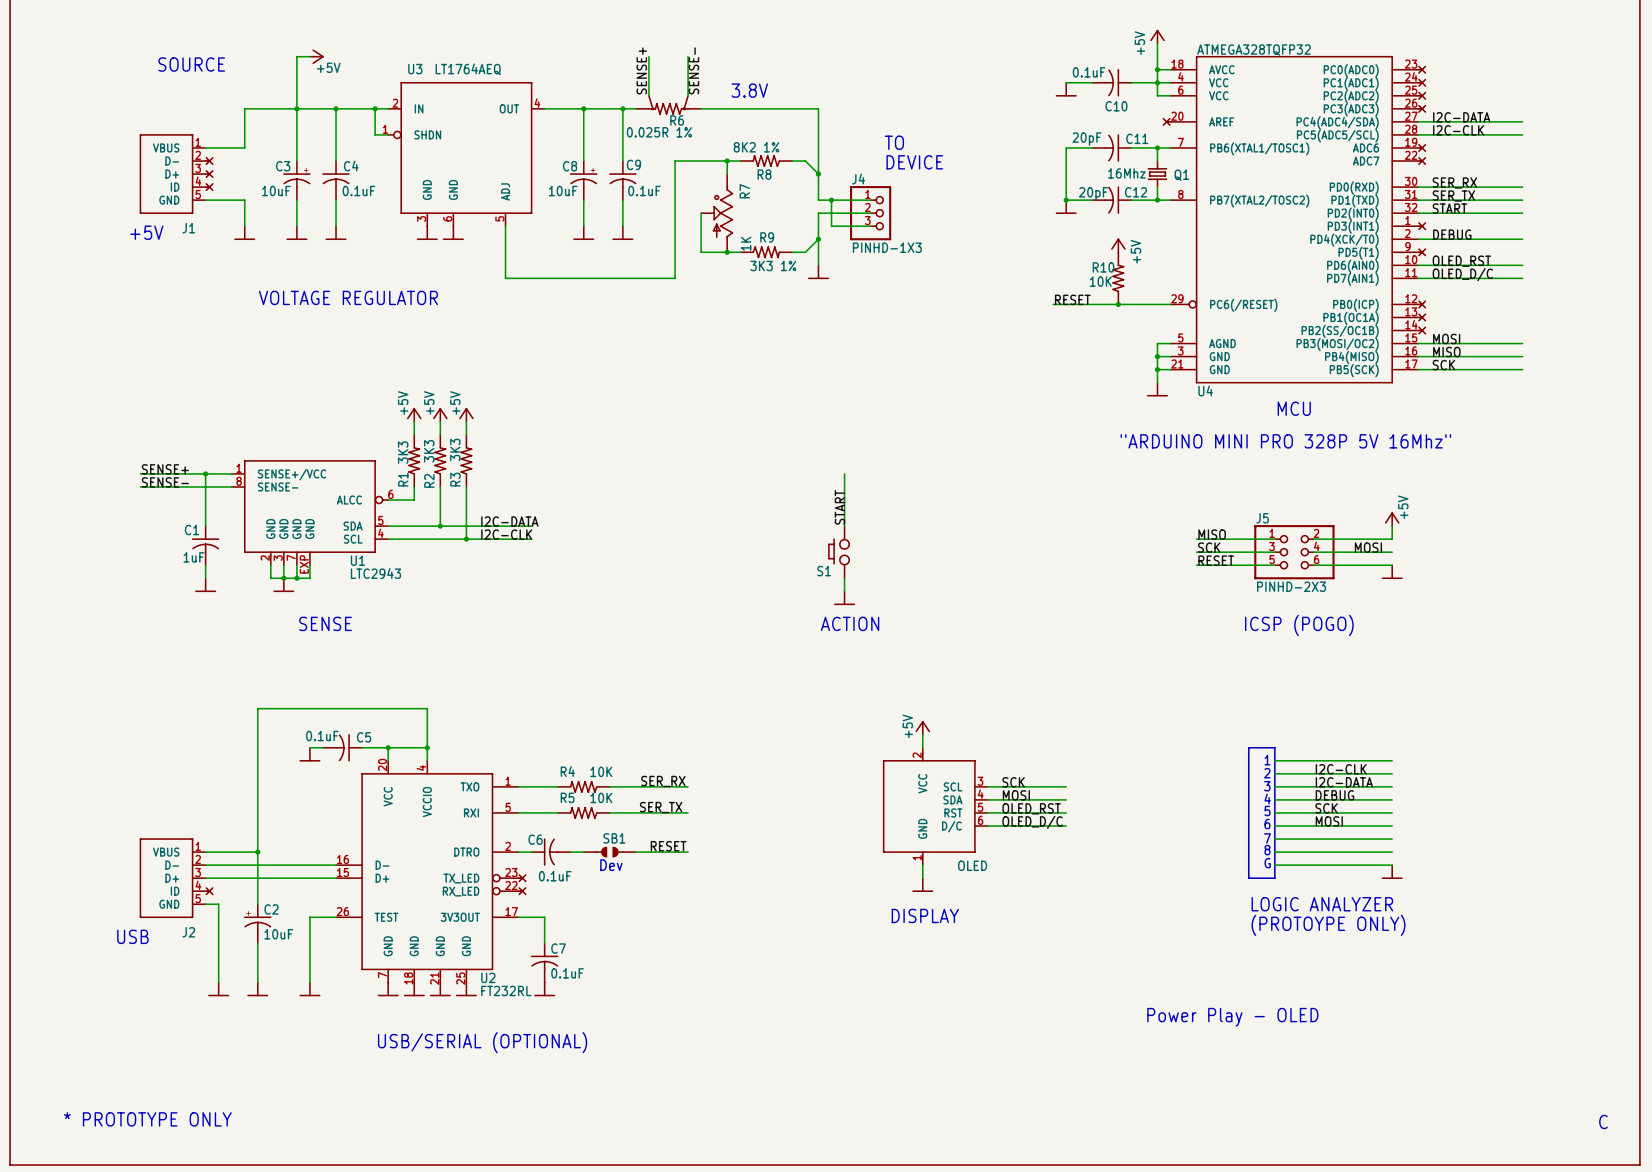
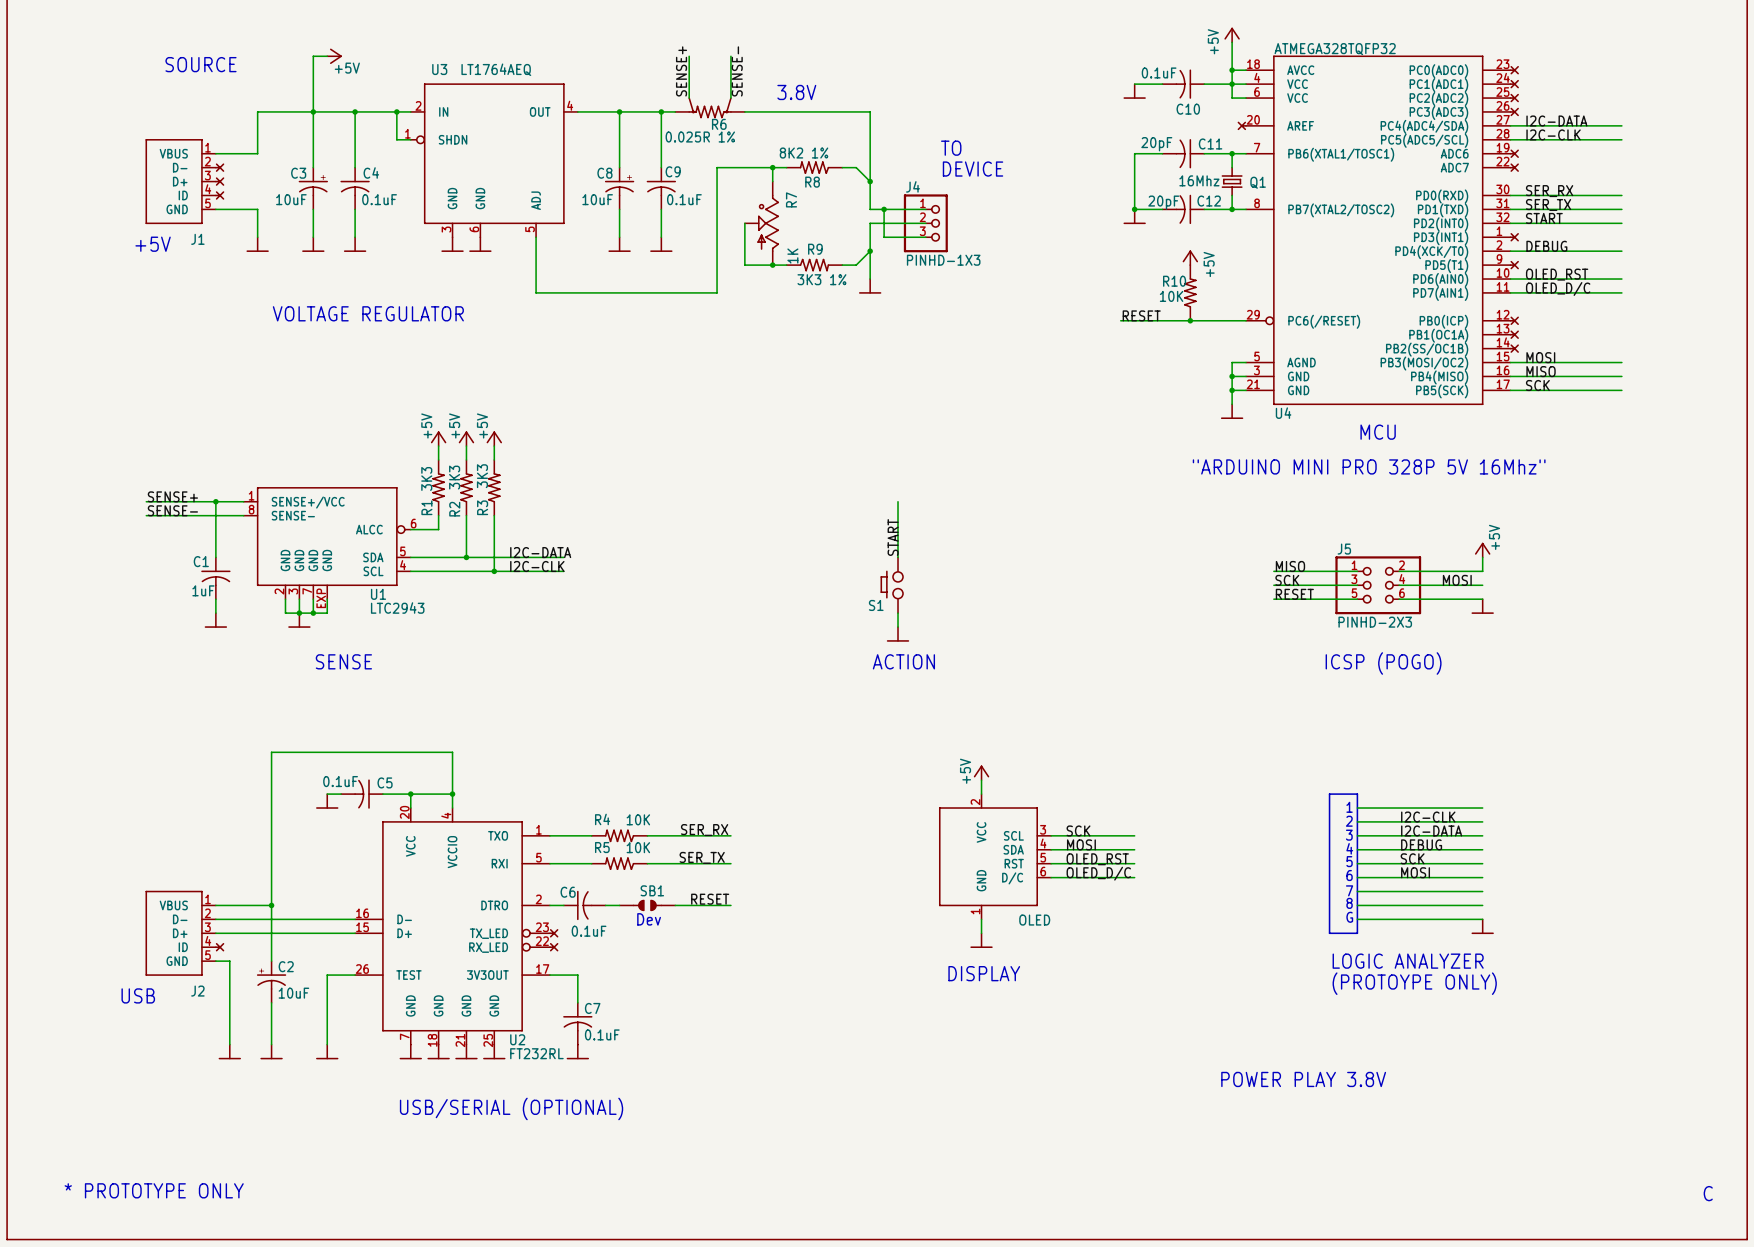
text: Power Play - OLED (1232, 1017) -> POWER PLAY 3.8V (1303, 1079)

